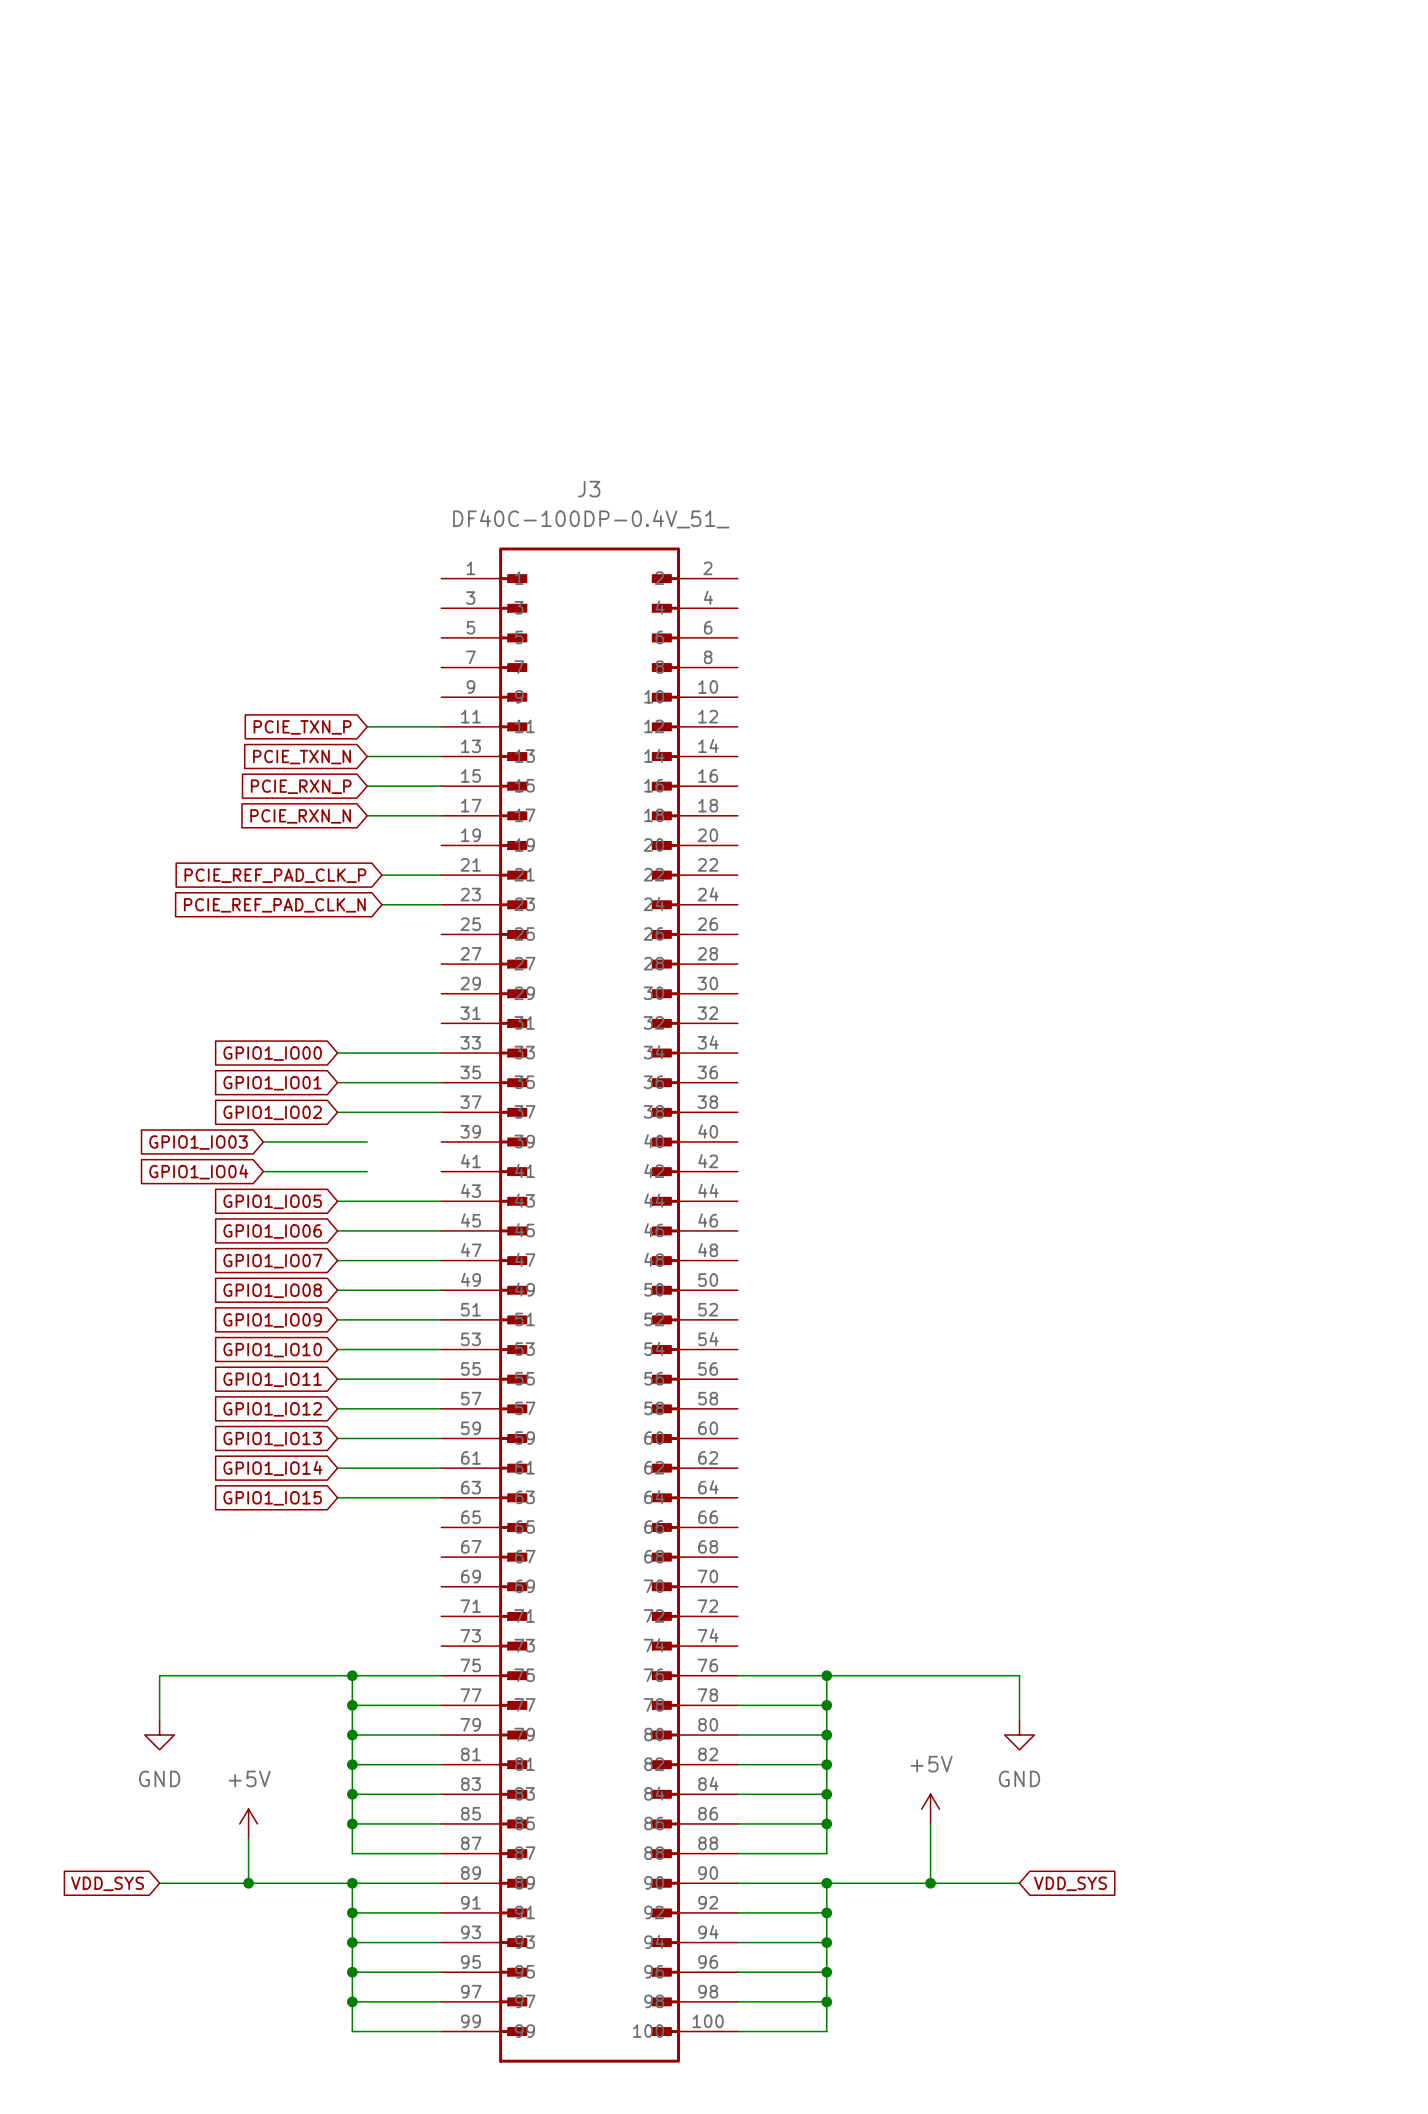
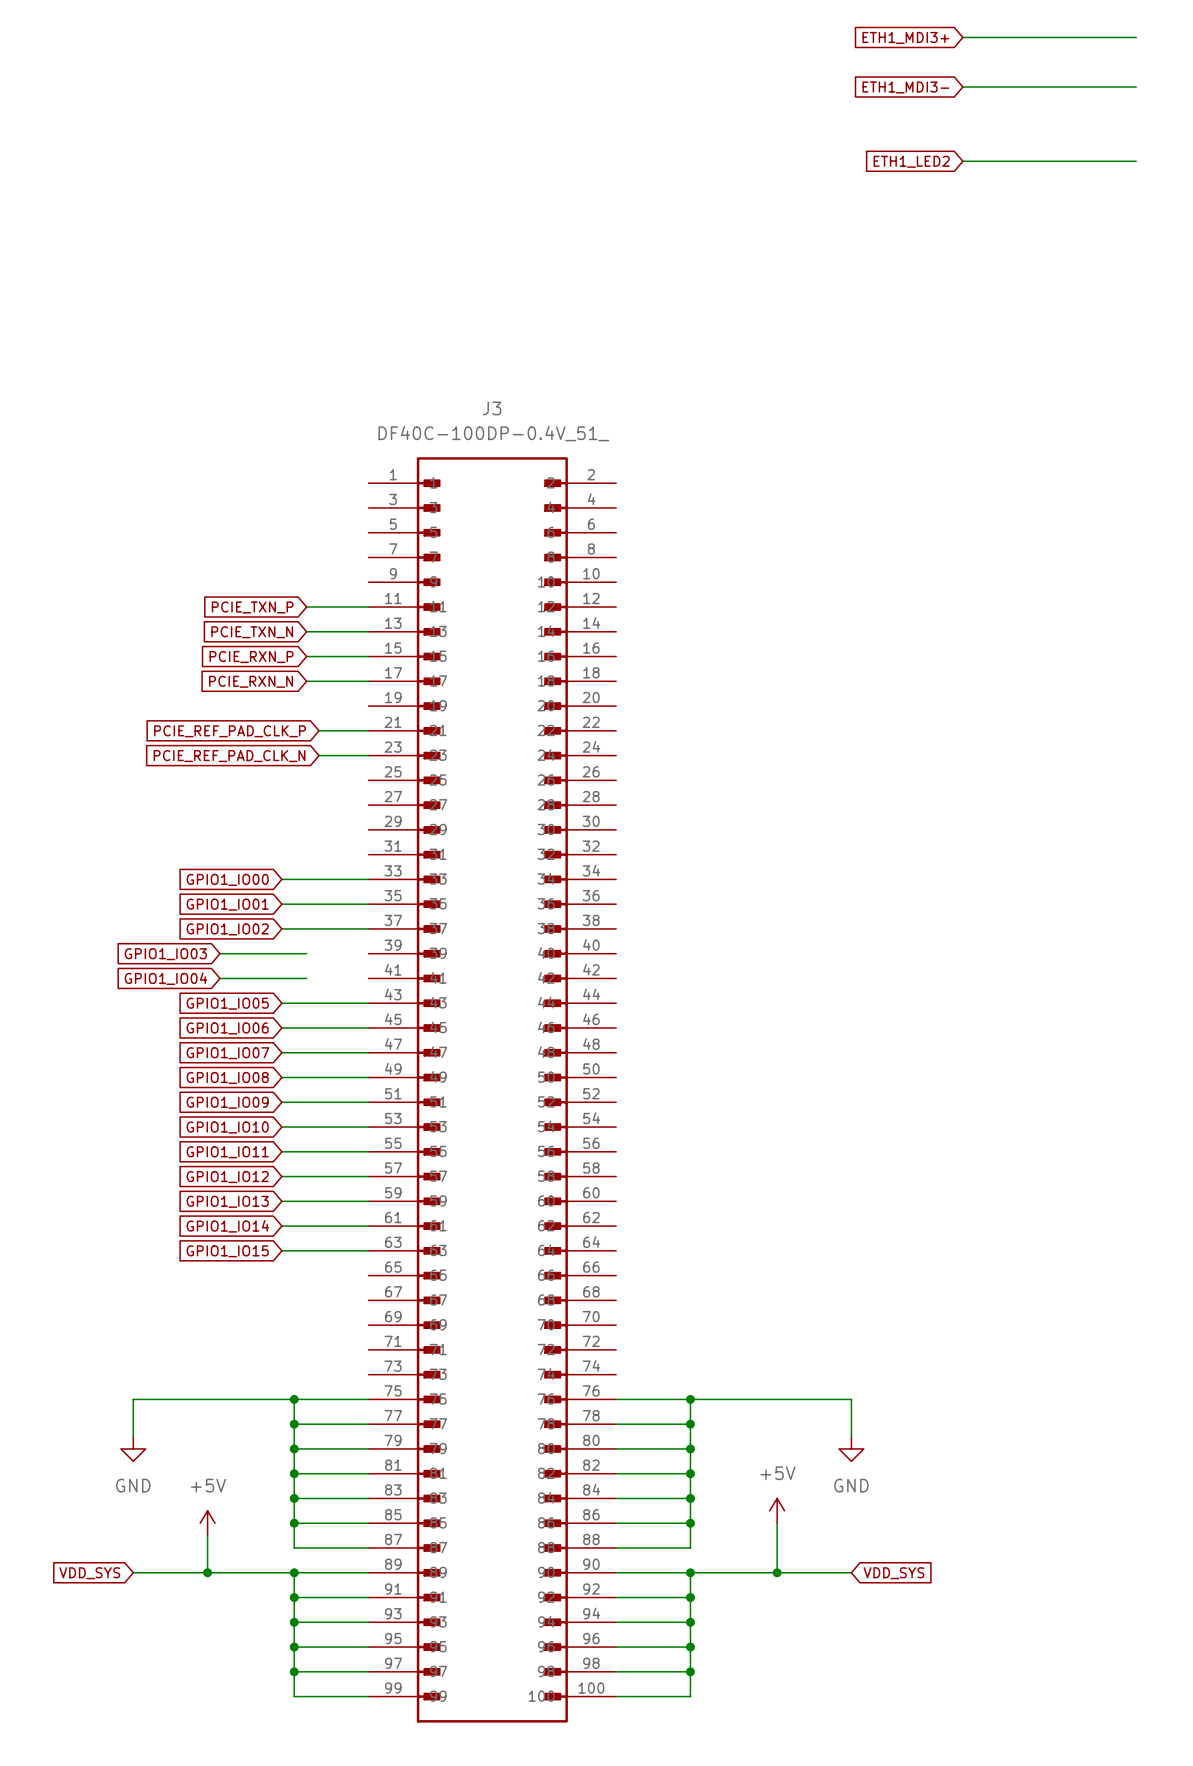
wire: none -> (962, 37) (1136, 37)
global label: none -> ETH1_MDI3+ (905, 37)
global label: none -> ETH1_MDI3- (905, 87)
wire: none -> (962, 87) (1136, 87)
global label: none -> ETH1_LED2 (911, 161)
wire: none -> (962, 161) (1136, 161)

